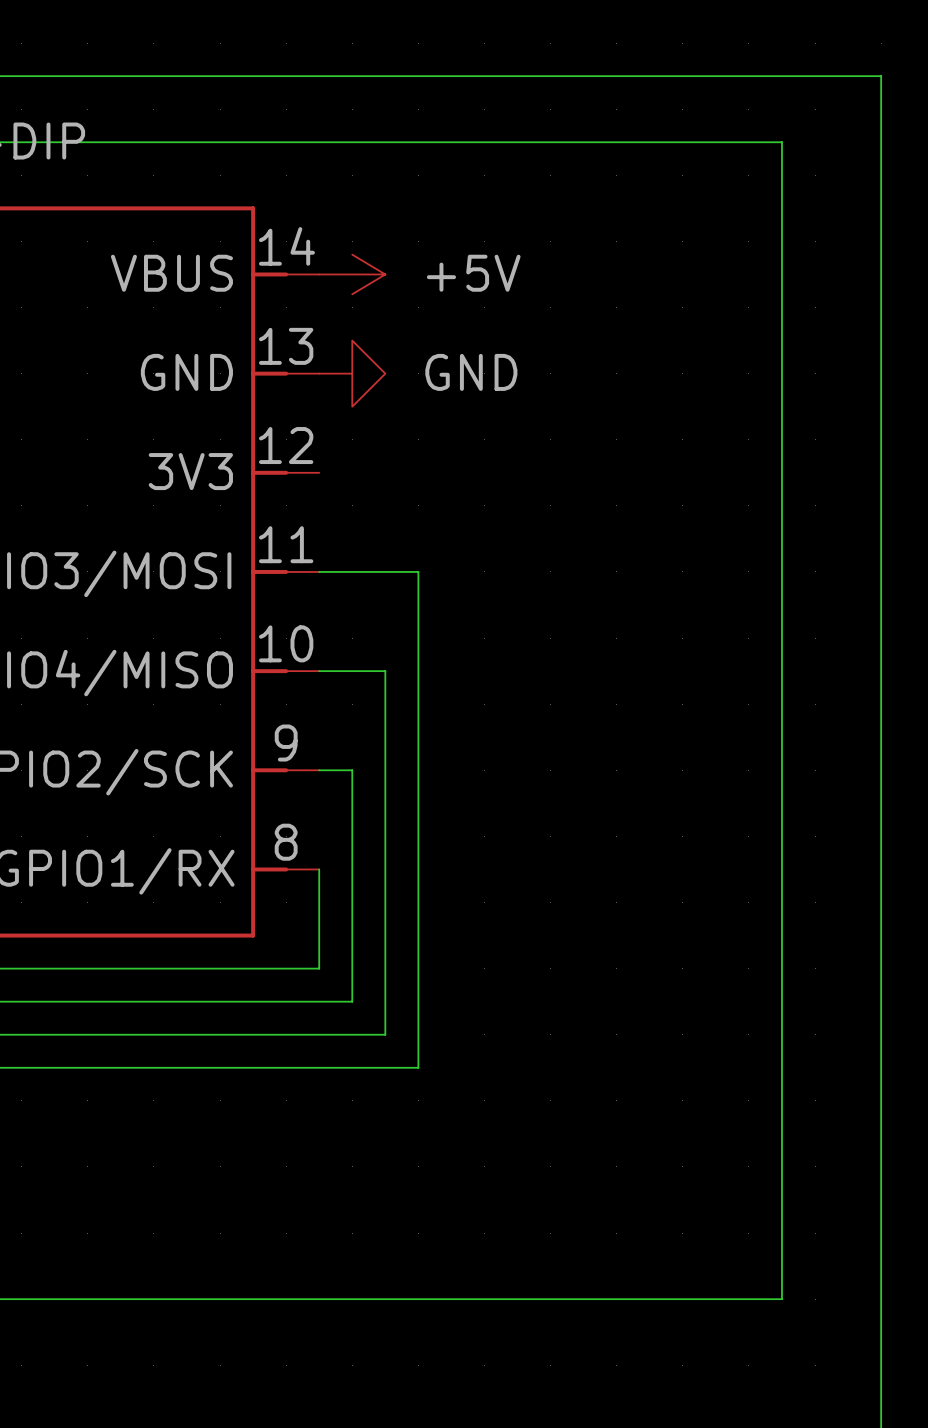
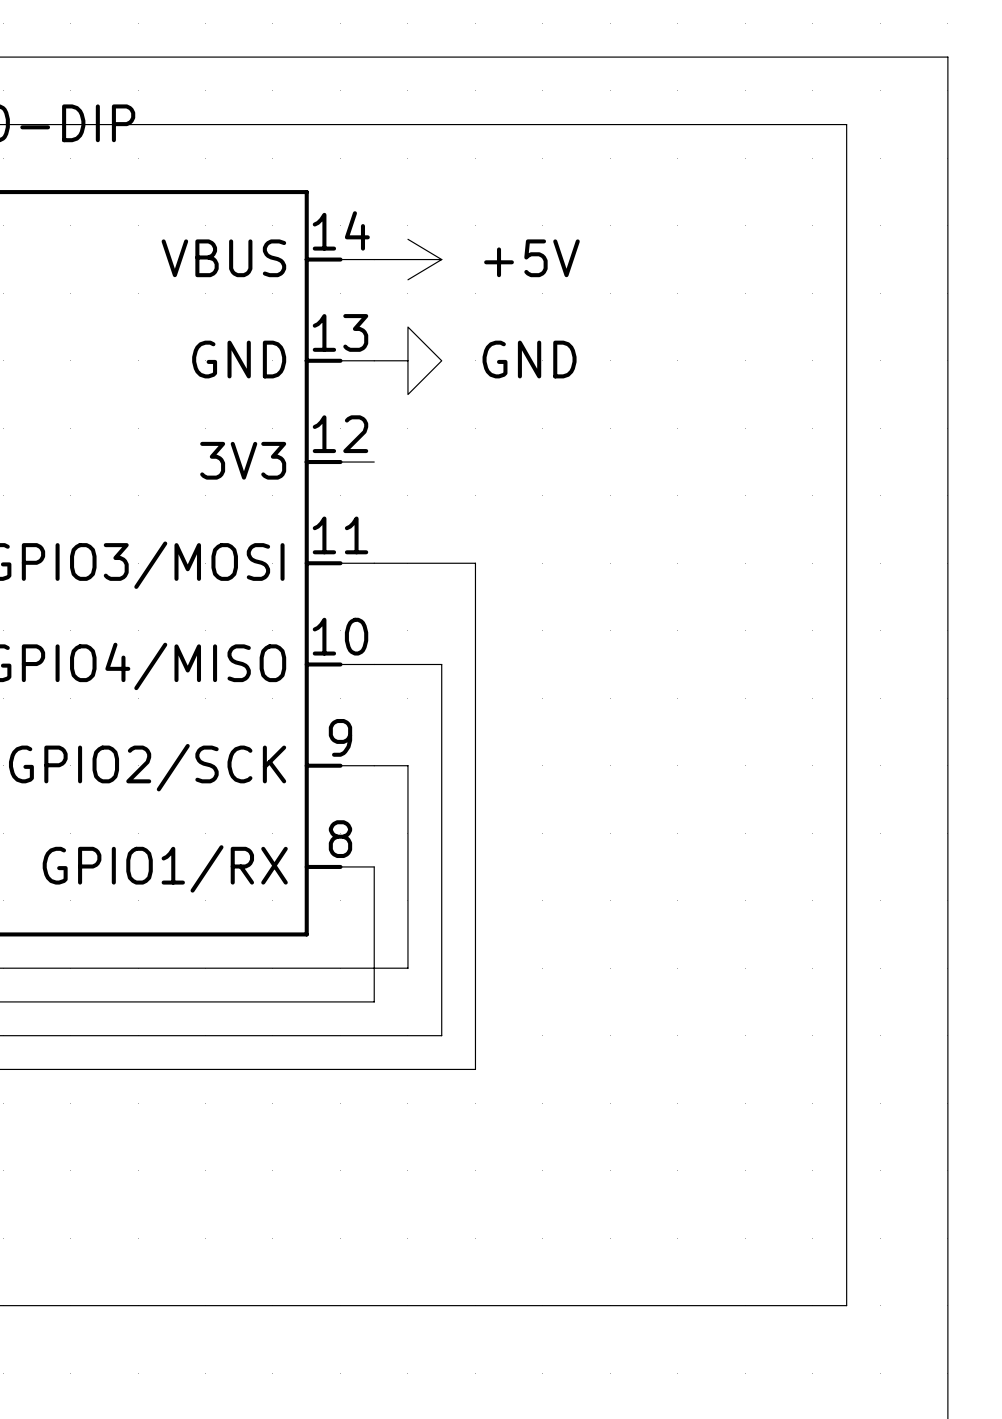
wire: (352, 968) (352, 1001) (319, 1001) -> (407, 968) (374, 968) (374, 1001)

